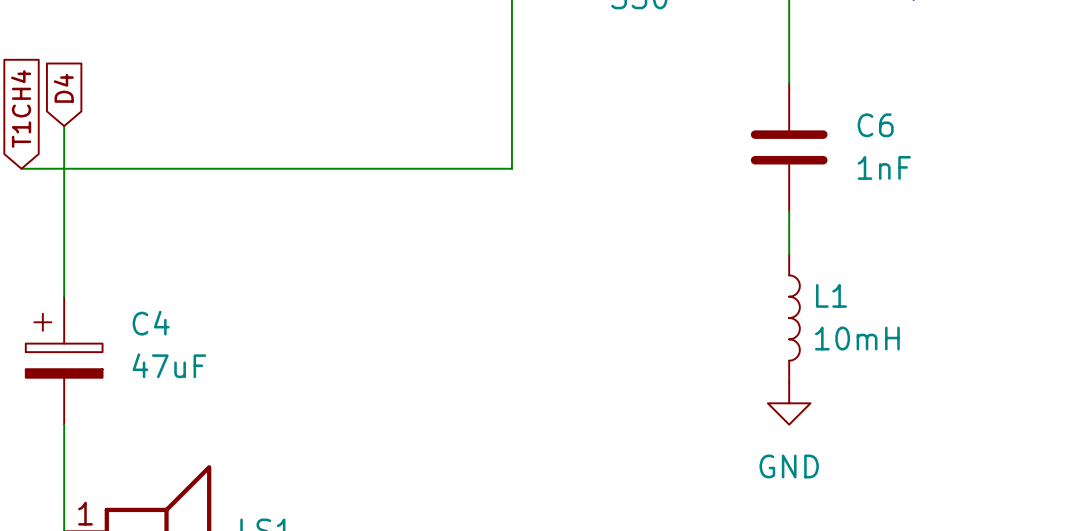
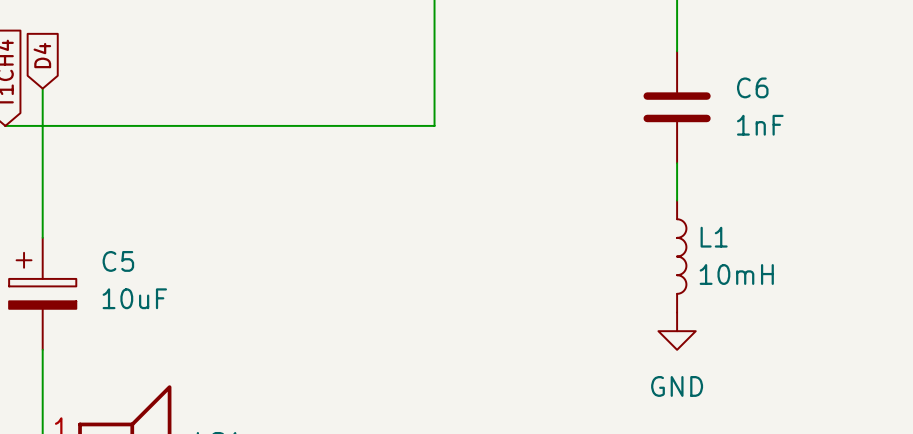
C4 name: C4 (151, 323) -> C5 (118, 261)
C4 value: 47uF (169, 365) -> 10uF (134, 298)

